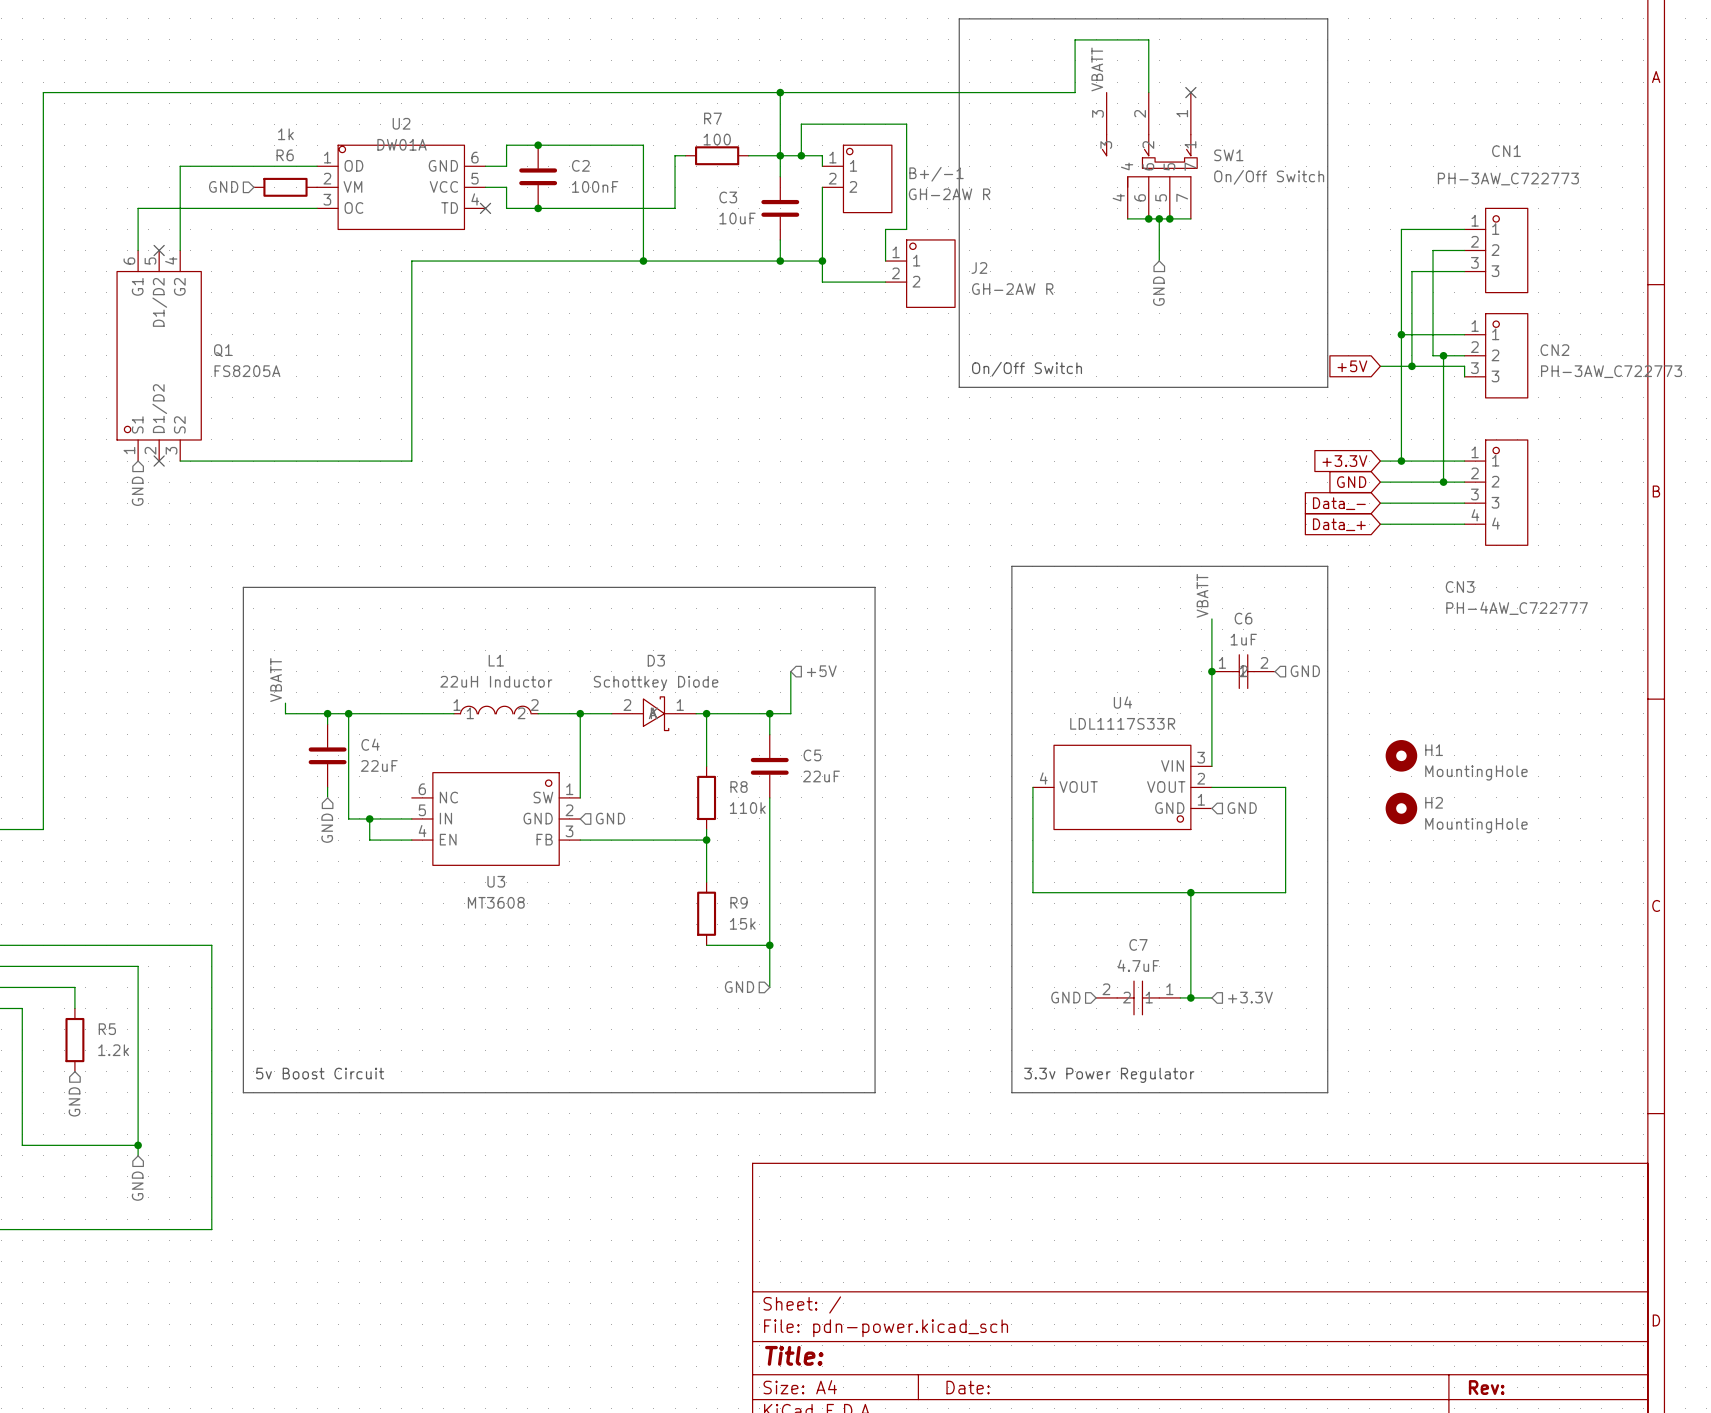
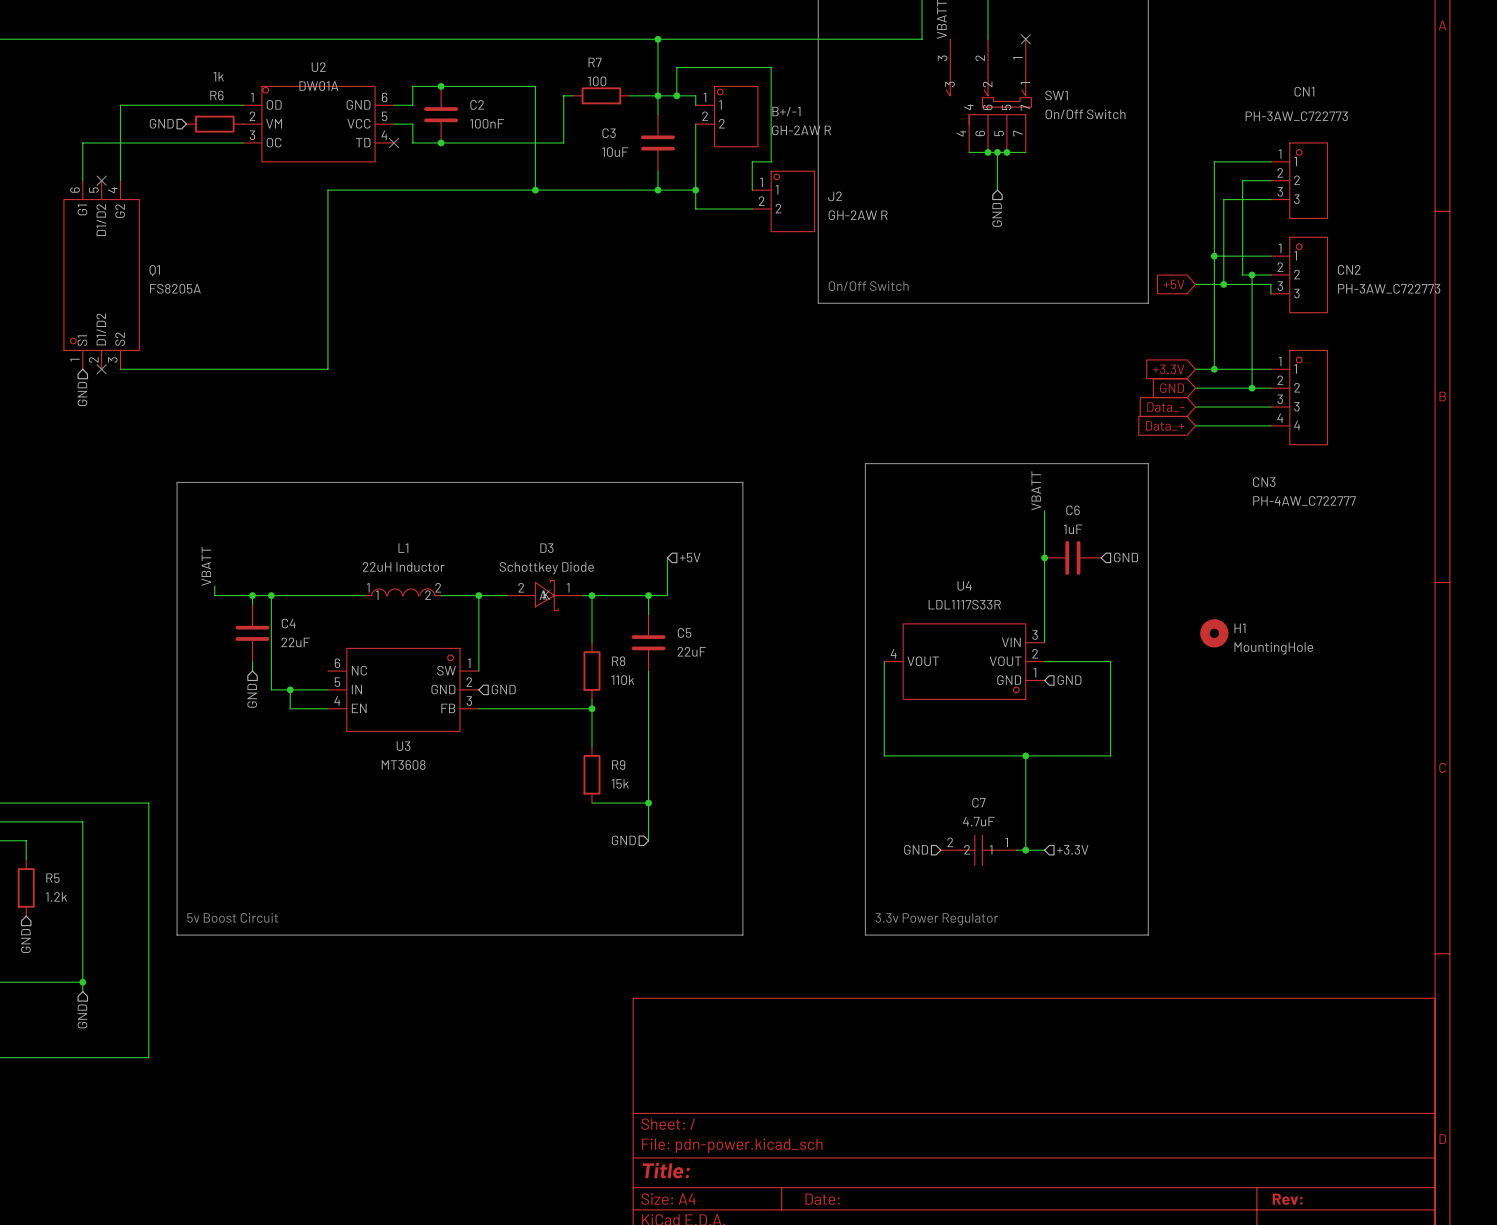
C6 symbol: [1211, 654, 1276, 689] -> [1044, 540, 1102, 575]
H2: MountingHole (1401, 808) -> none

